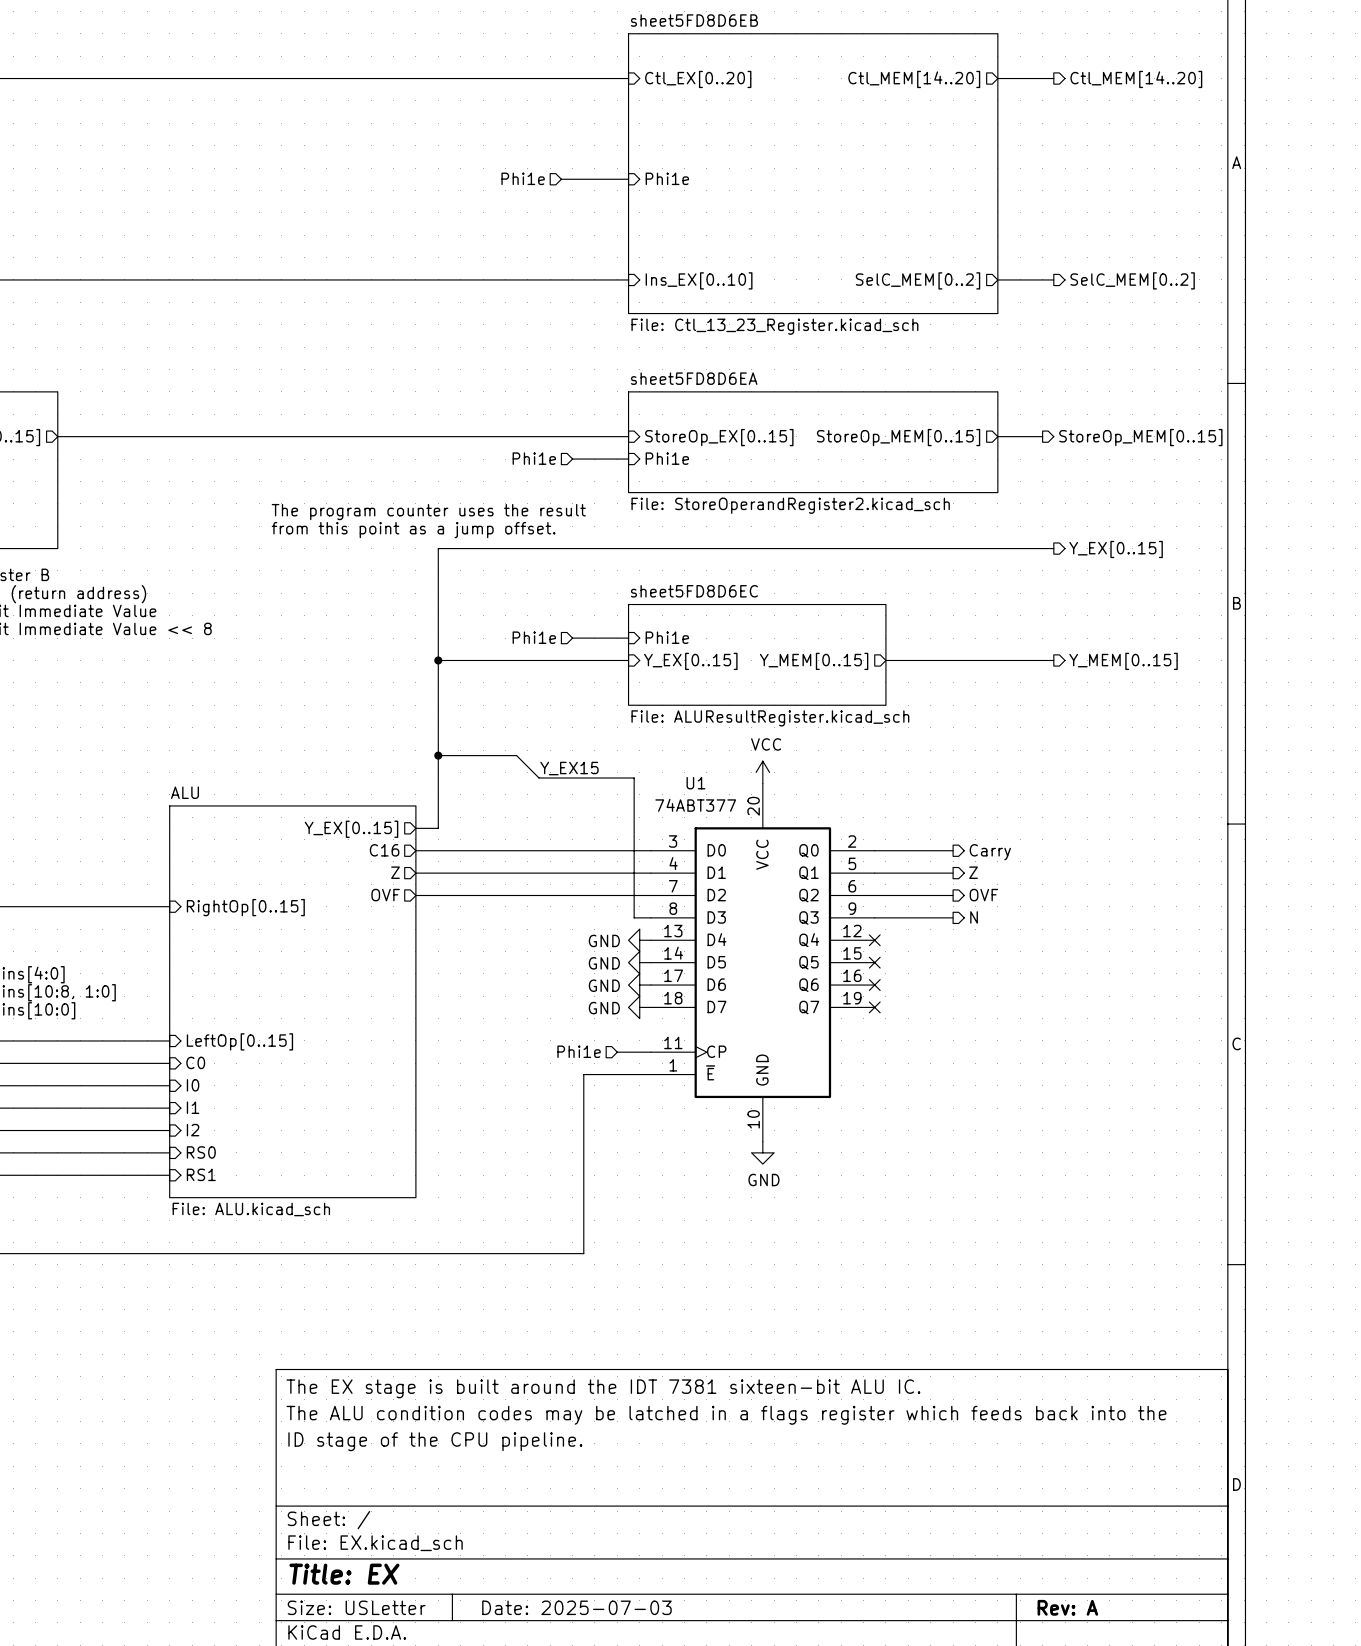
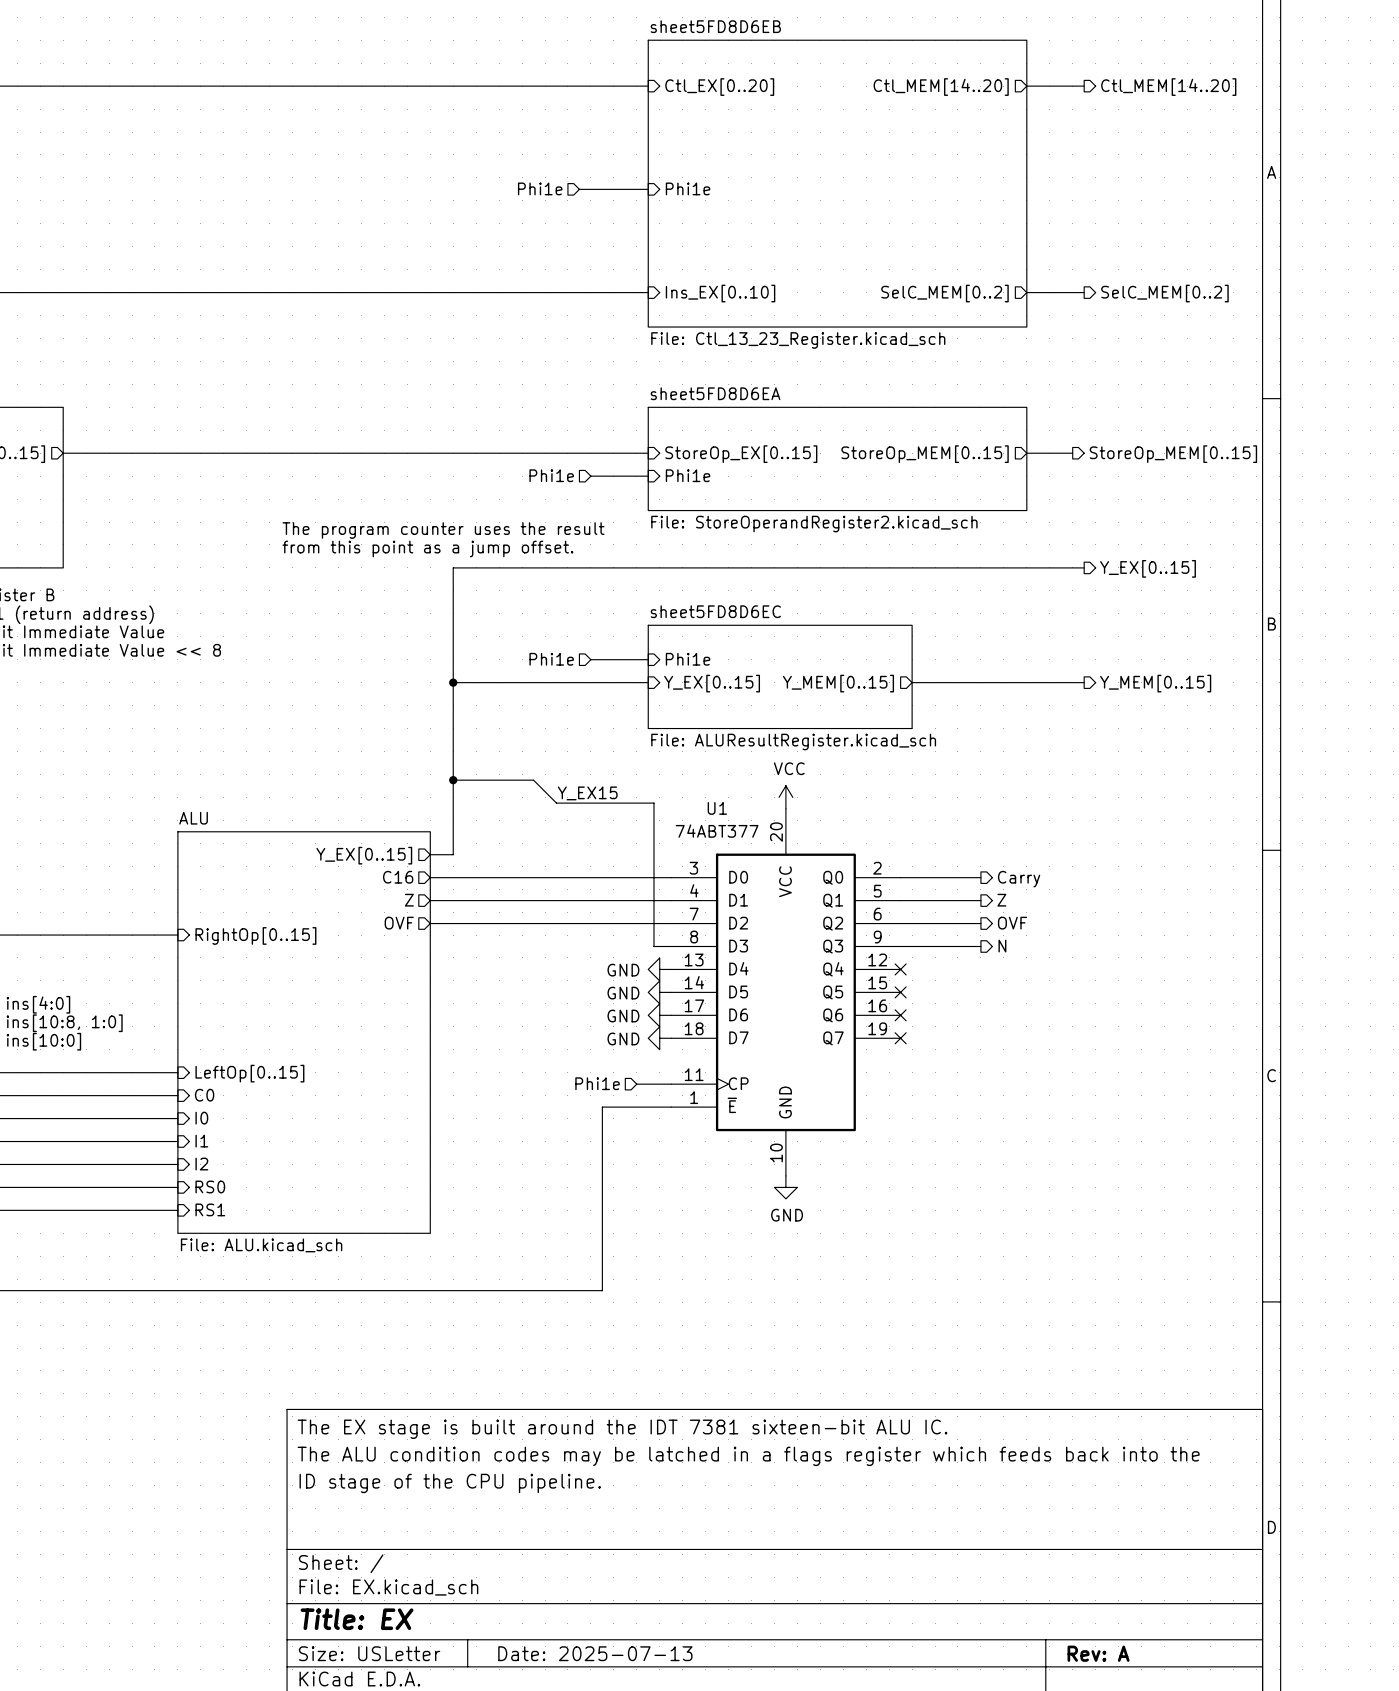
title block: Date: 2025-07-03 (576, 1607) -> Date: 2025-07-13 (595, 1653)

